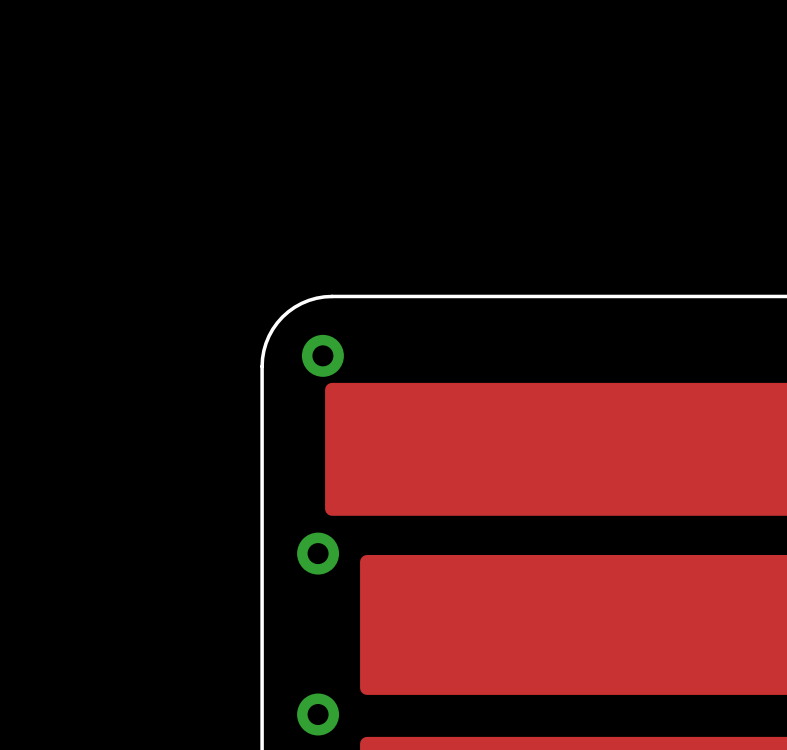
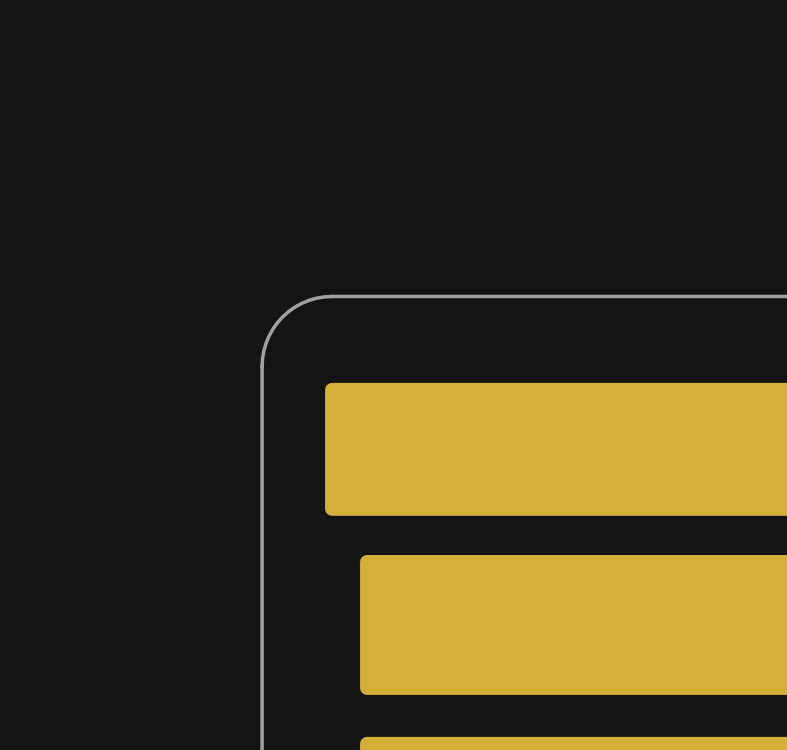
via: (322, 355) -> none
via: (318, 553) -> none
via: (318, 714) -> none

